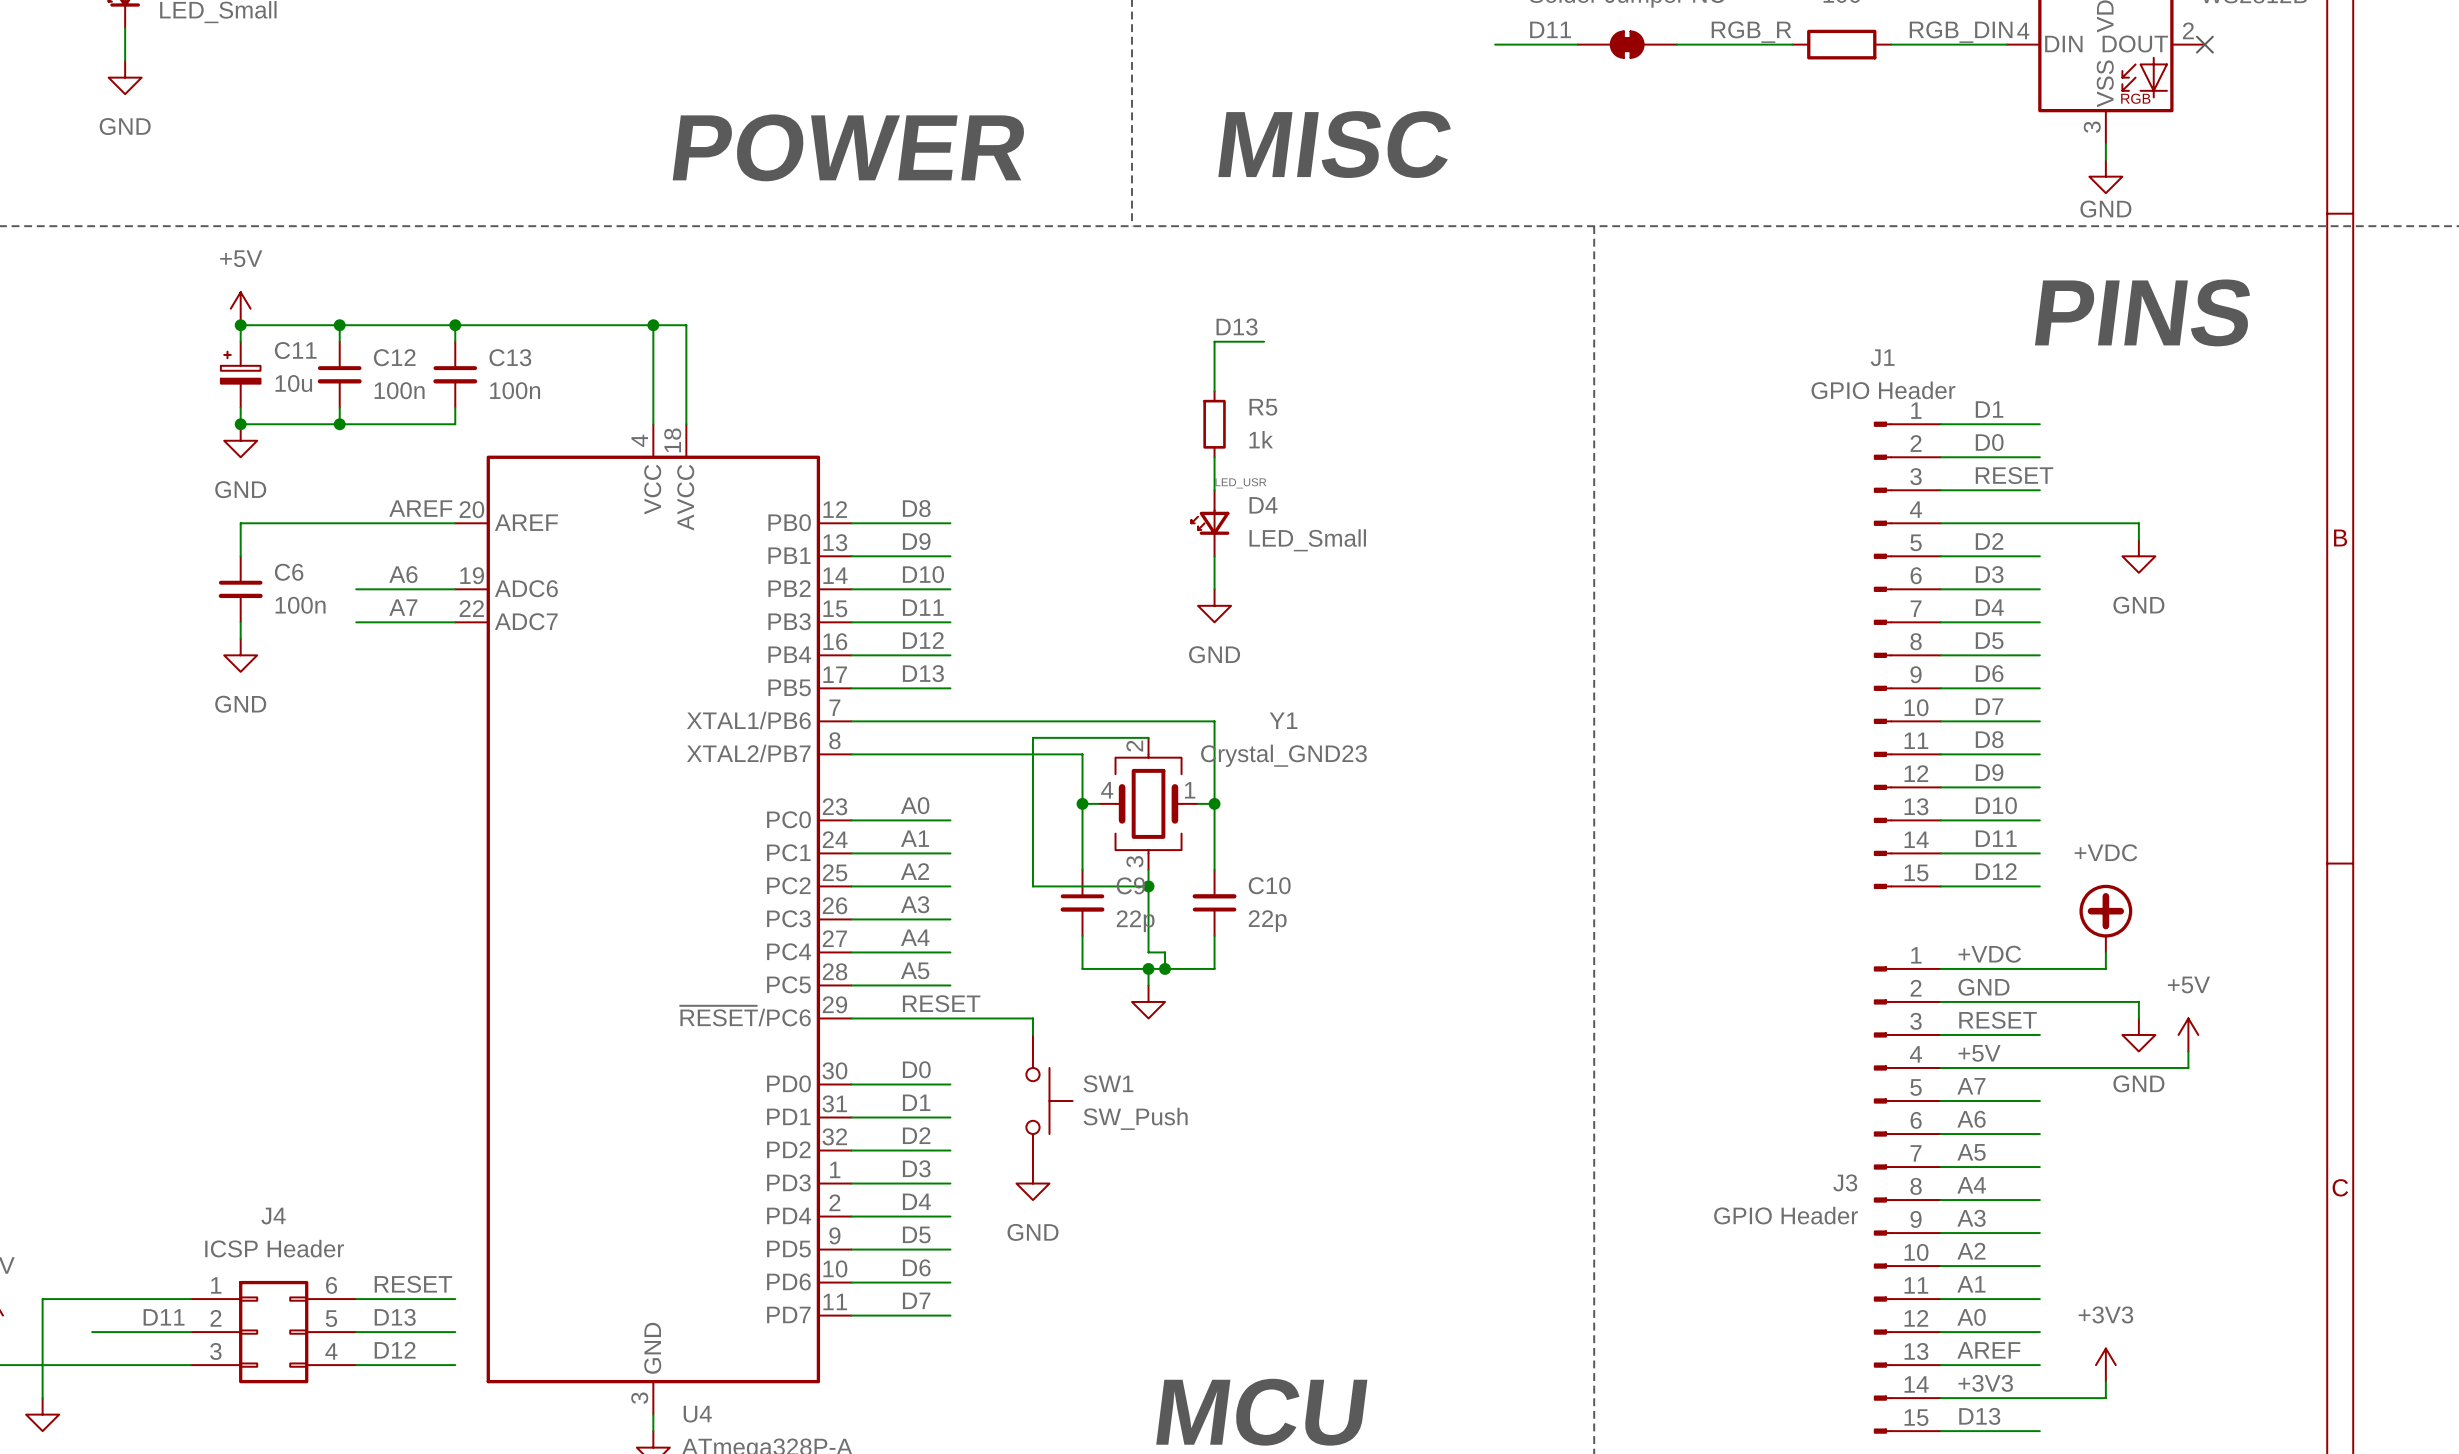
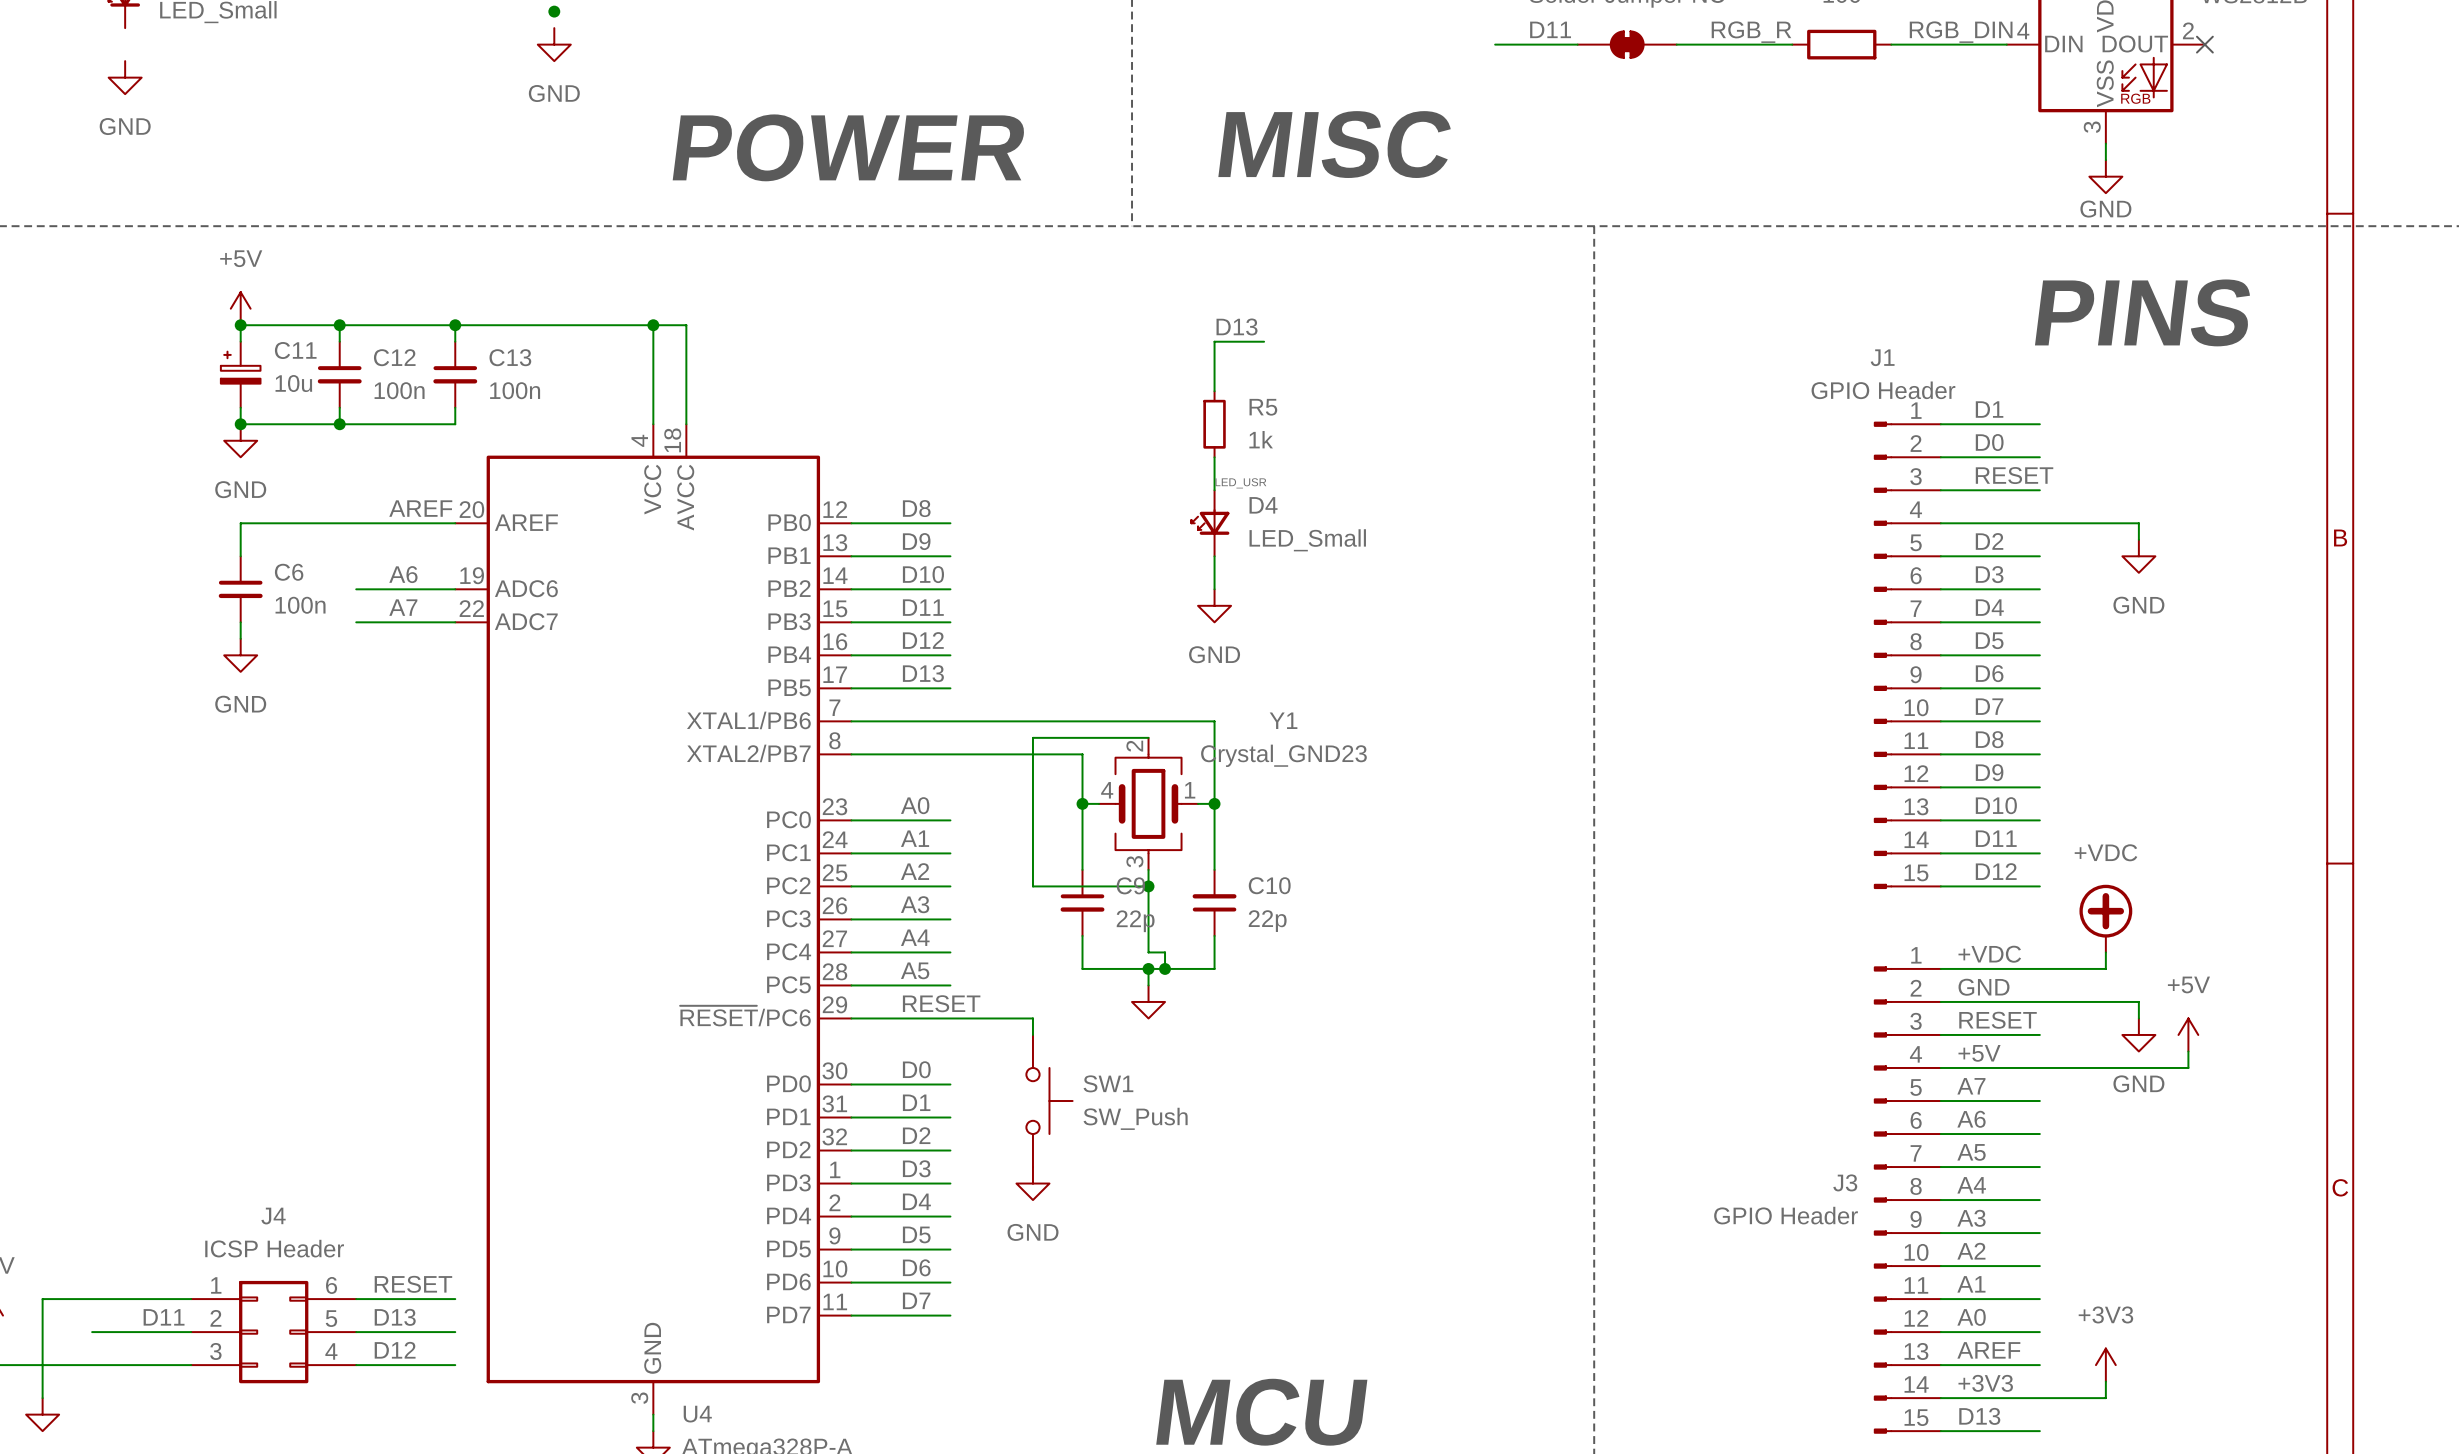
junction: none -> (554, 11)
wire: (125, 28) (125, 61) -> none
power symbol: none -> GND (554, 44)

